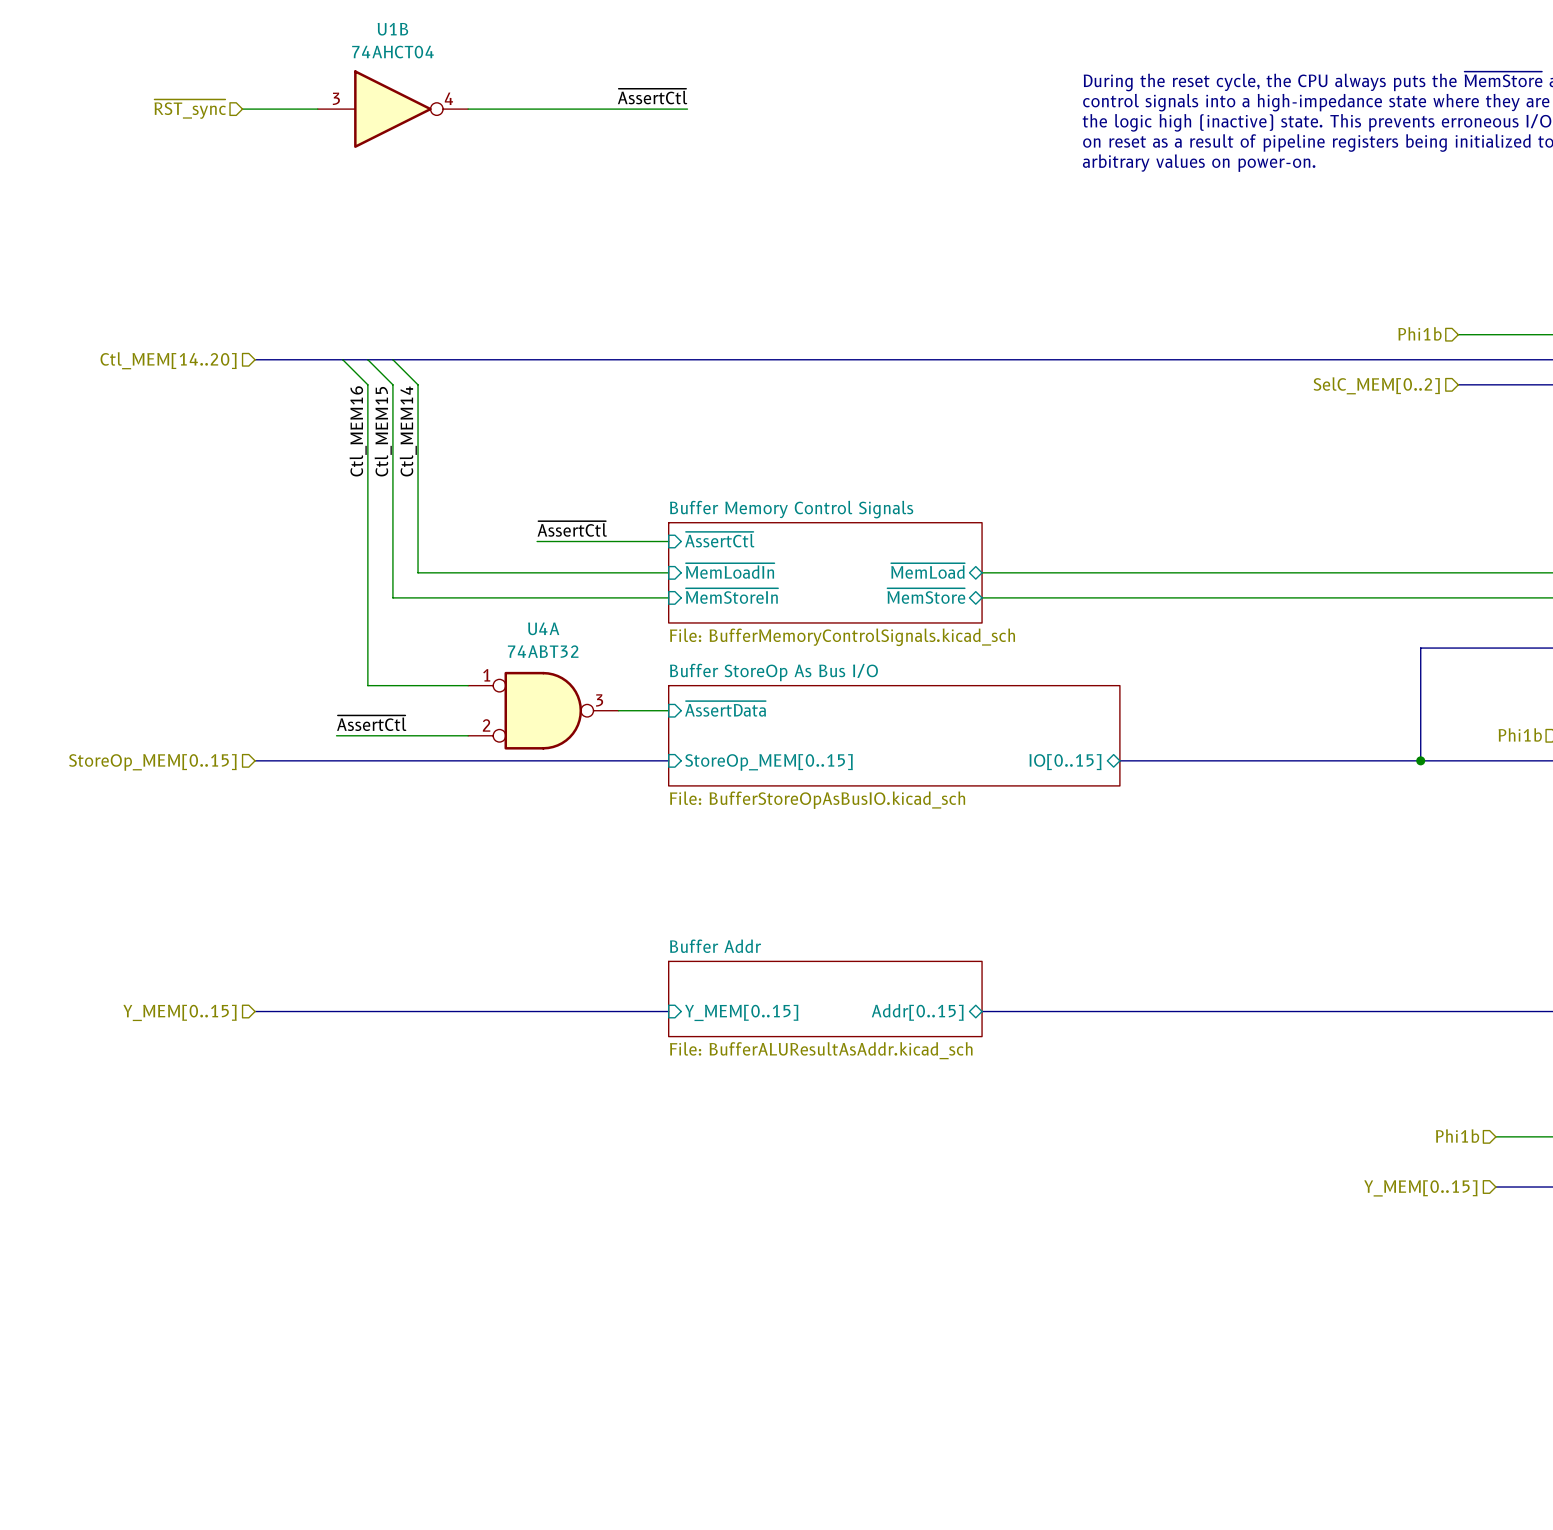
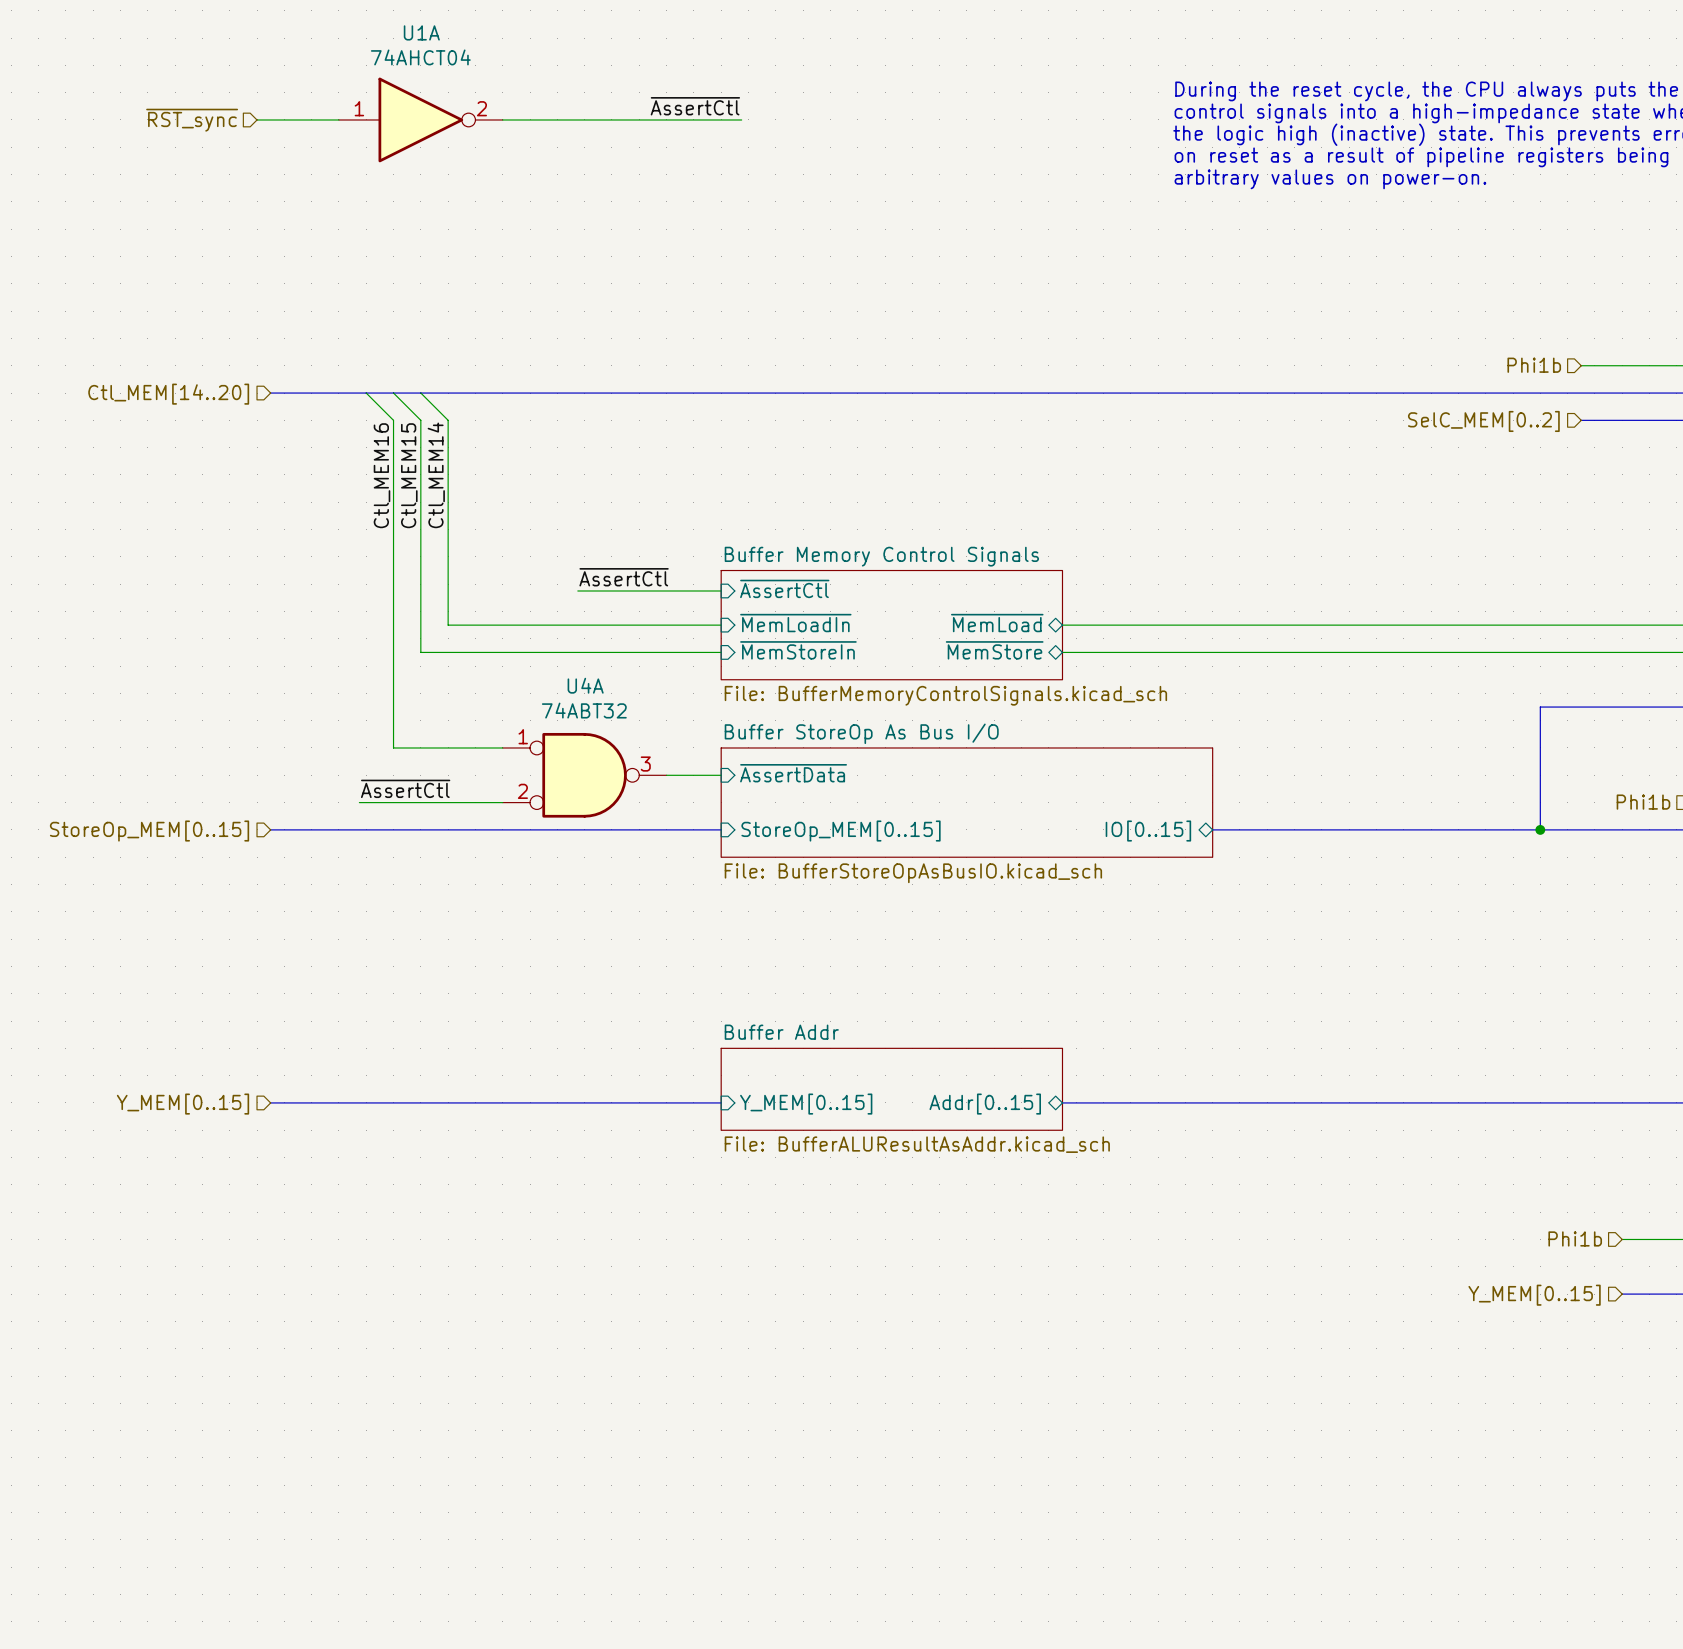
U1B name: U1B (392, 29) -> U1A (421, 32)
U1B pin number: 3 (336, 98) -> 1 (359, 108)
U1B pin number: 4 (448, 98) -> 2 (481, 108)

